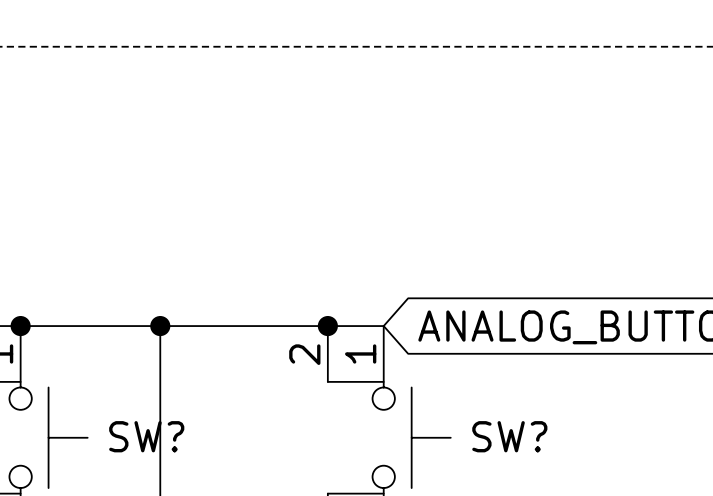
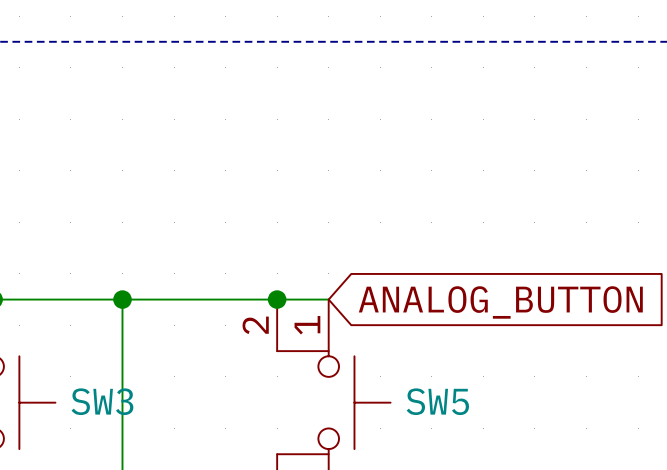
SW? name: SW? (146, 436) -> SW3 (102, 401)
SW? name: SW? (509, 436) -> SW5 (437, 401)

